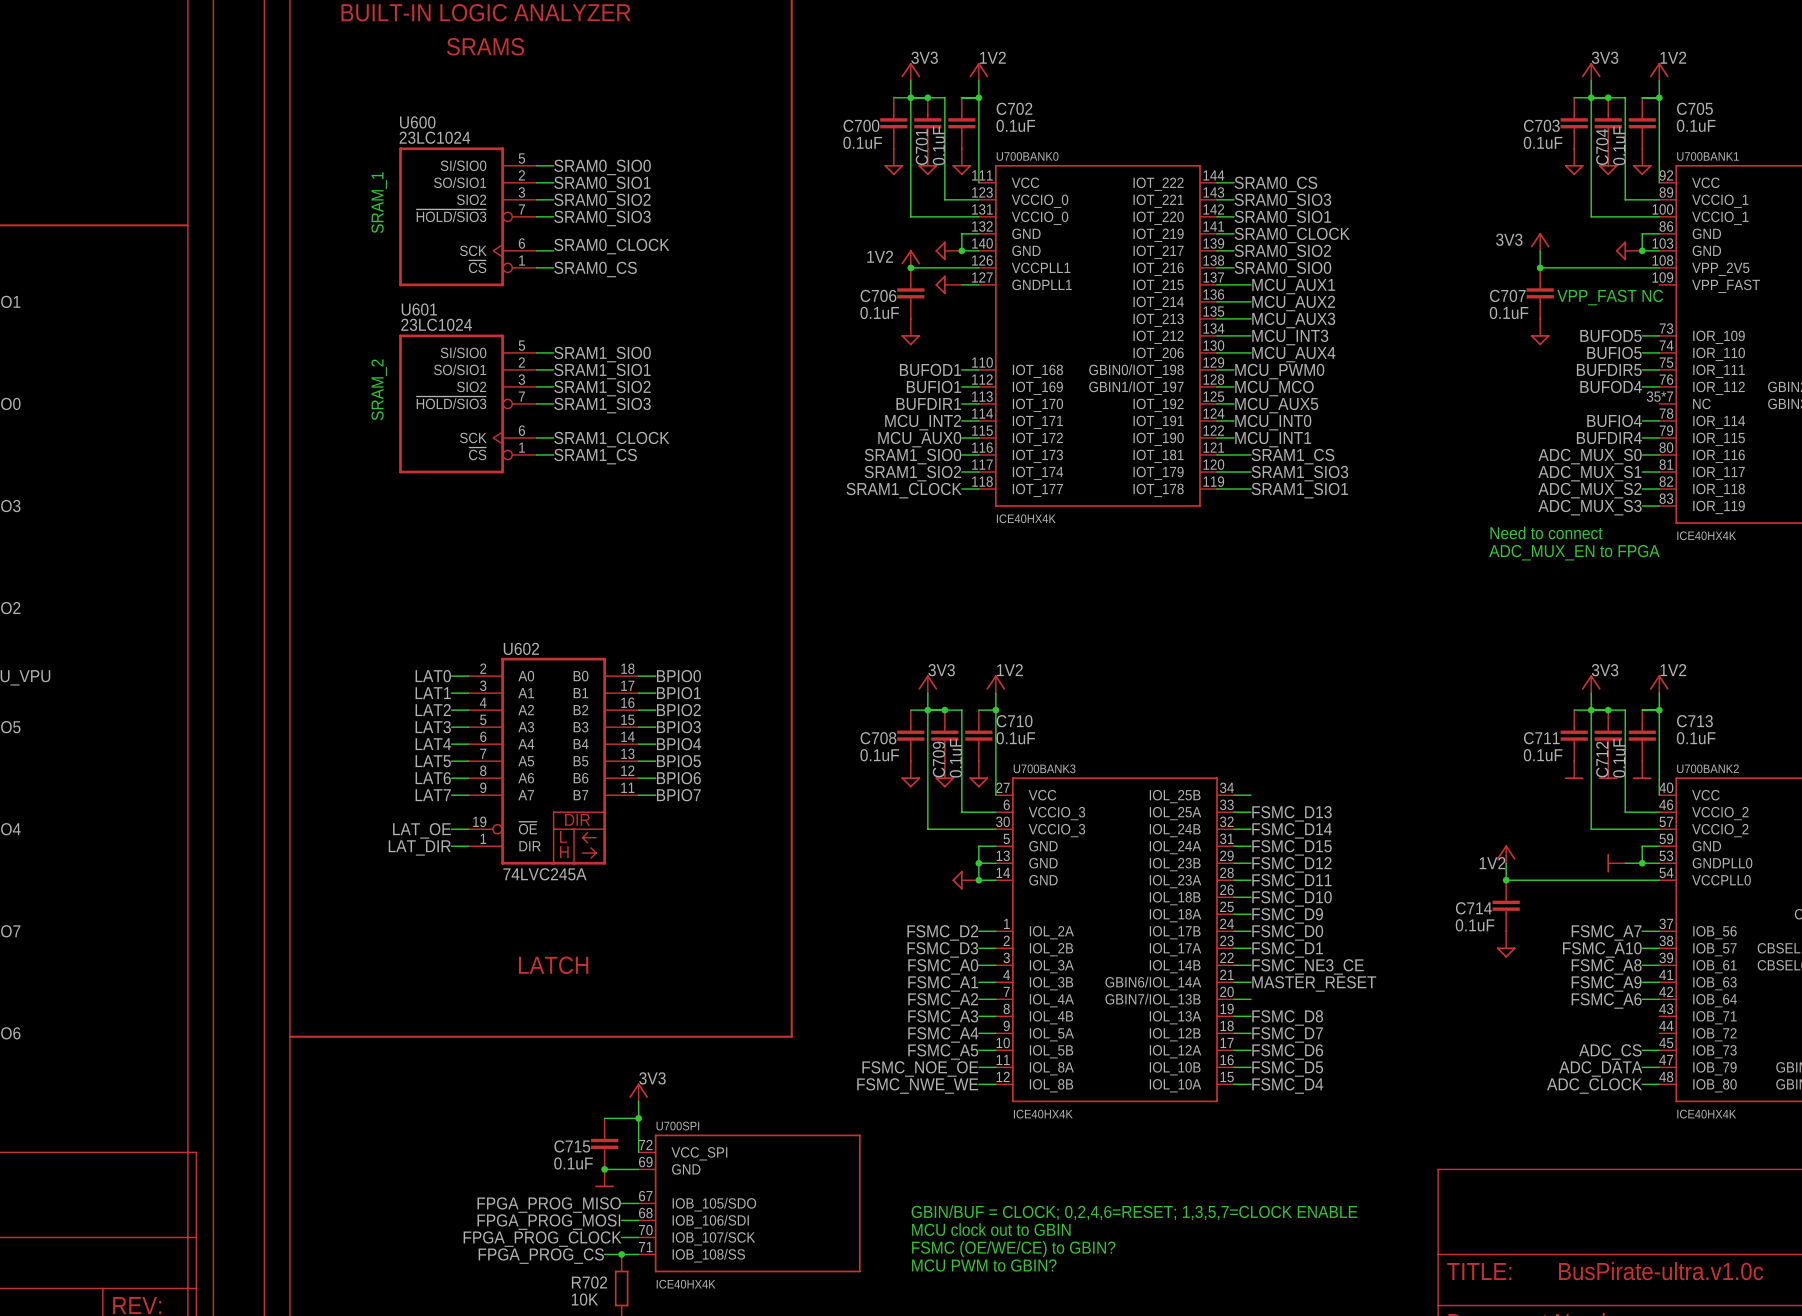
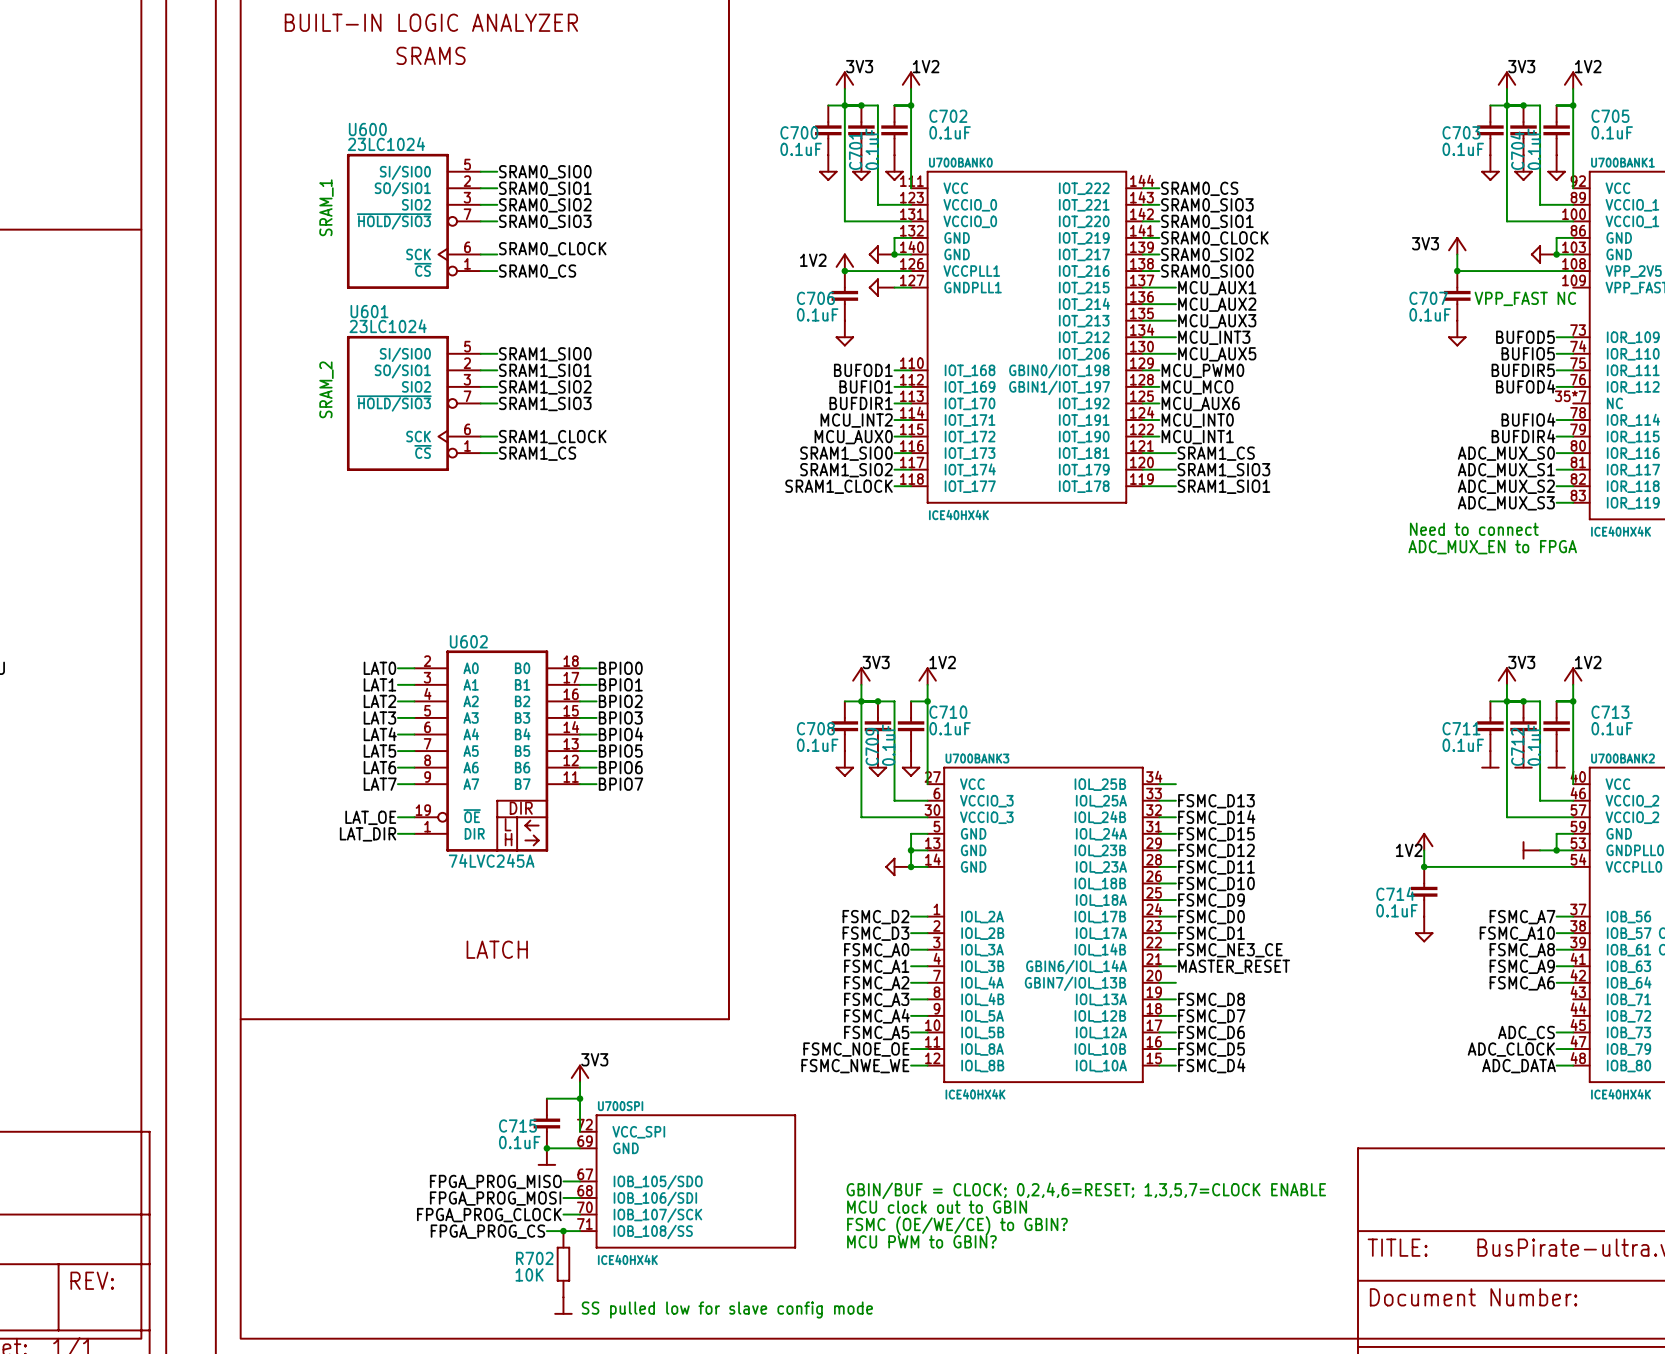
label: MCU_AUX4 (1293, 354) -> MCU_AUX5 (1217, 354)
label: MCU_AUX5 (1276, 405) -> MCU_AUX6 (1200, 404)
label: ADC_DATA (1600, 1068) -> ADC_CLOCK (1511, 1049)
label: ADC_CLOCK (1594, 1085) -> ADC_DATA (1519, 1066)

